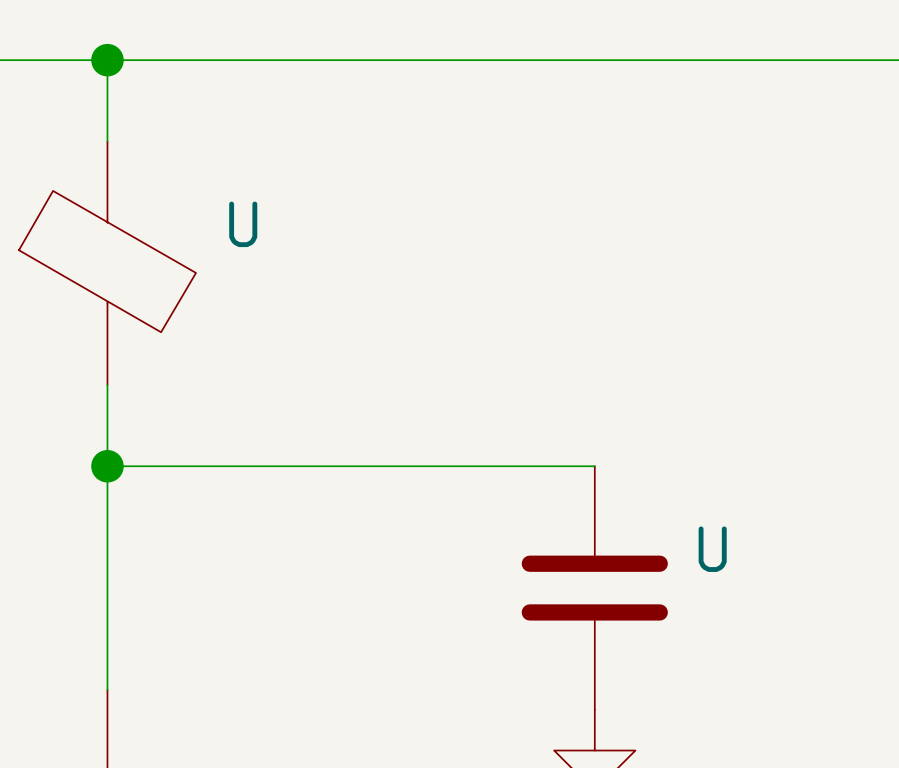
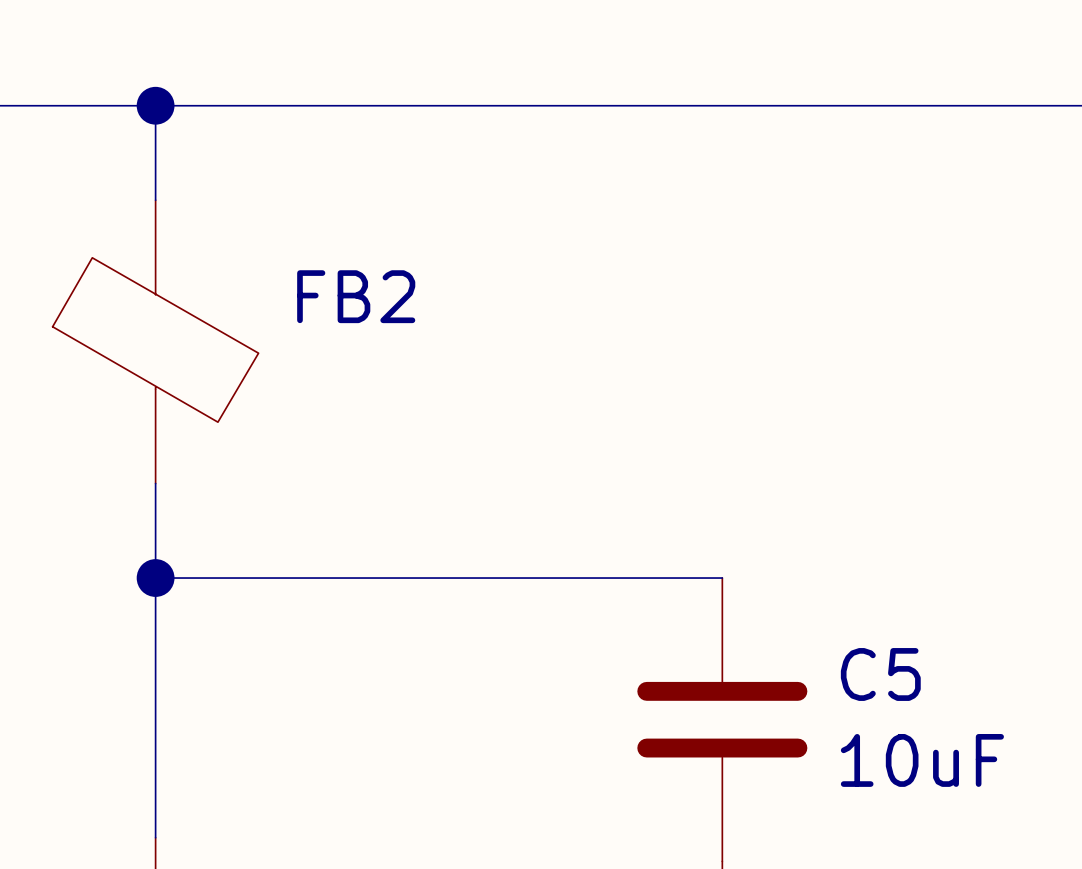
U name: U (243, 224) -> FB2 (356, 296)
U name: U (712, 549) -> C5 (880, 674)
U value: none -> 10uF (922, 760)

